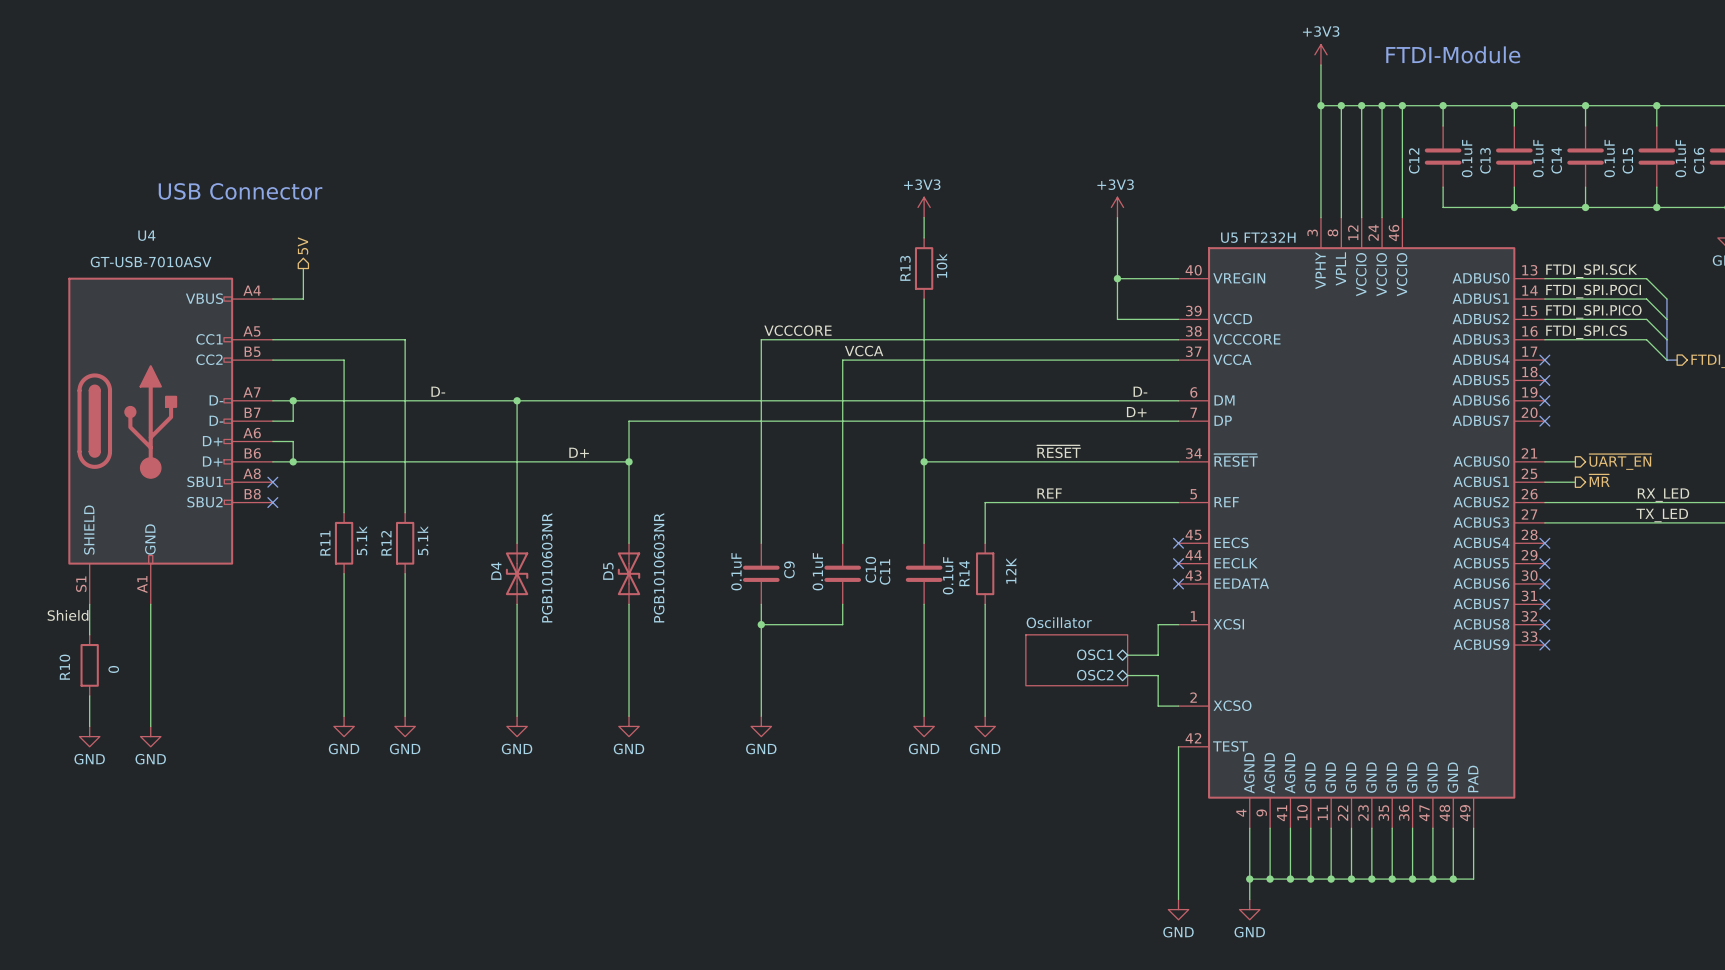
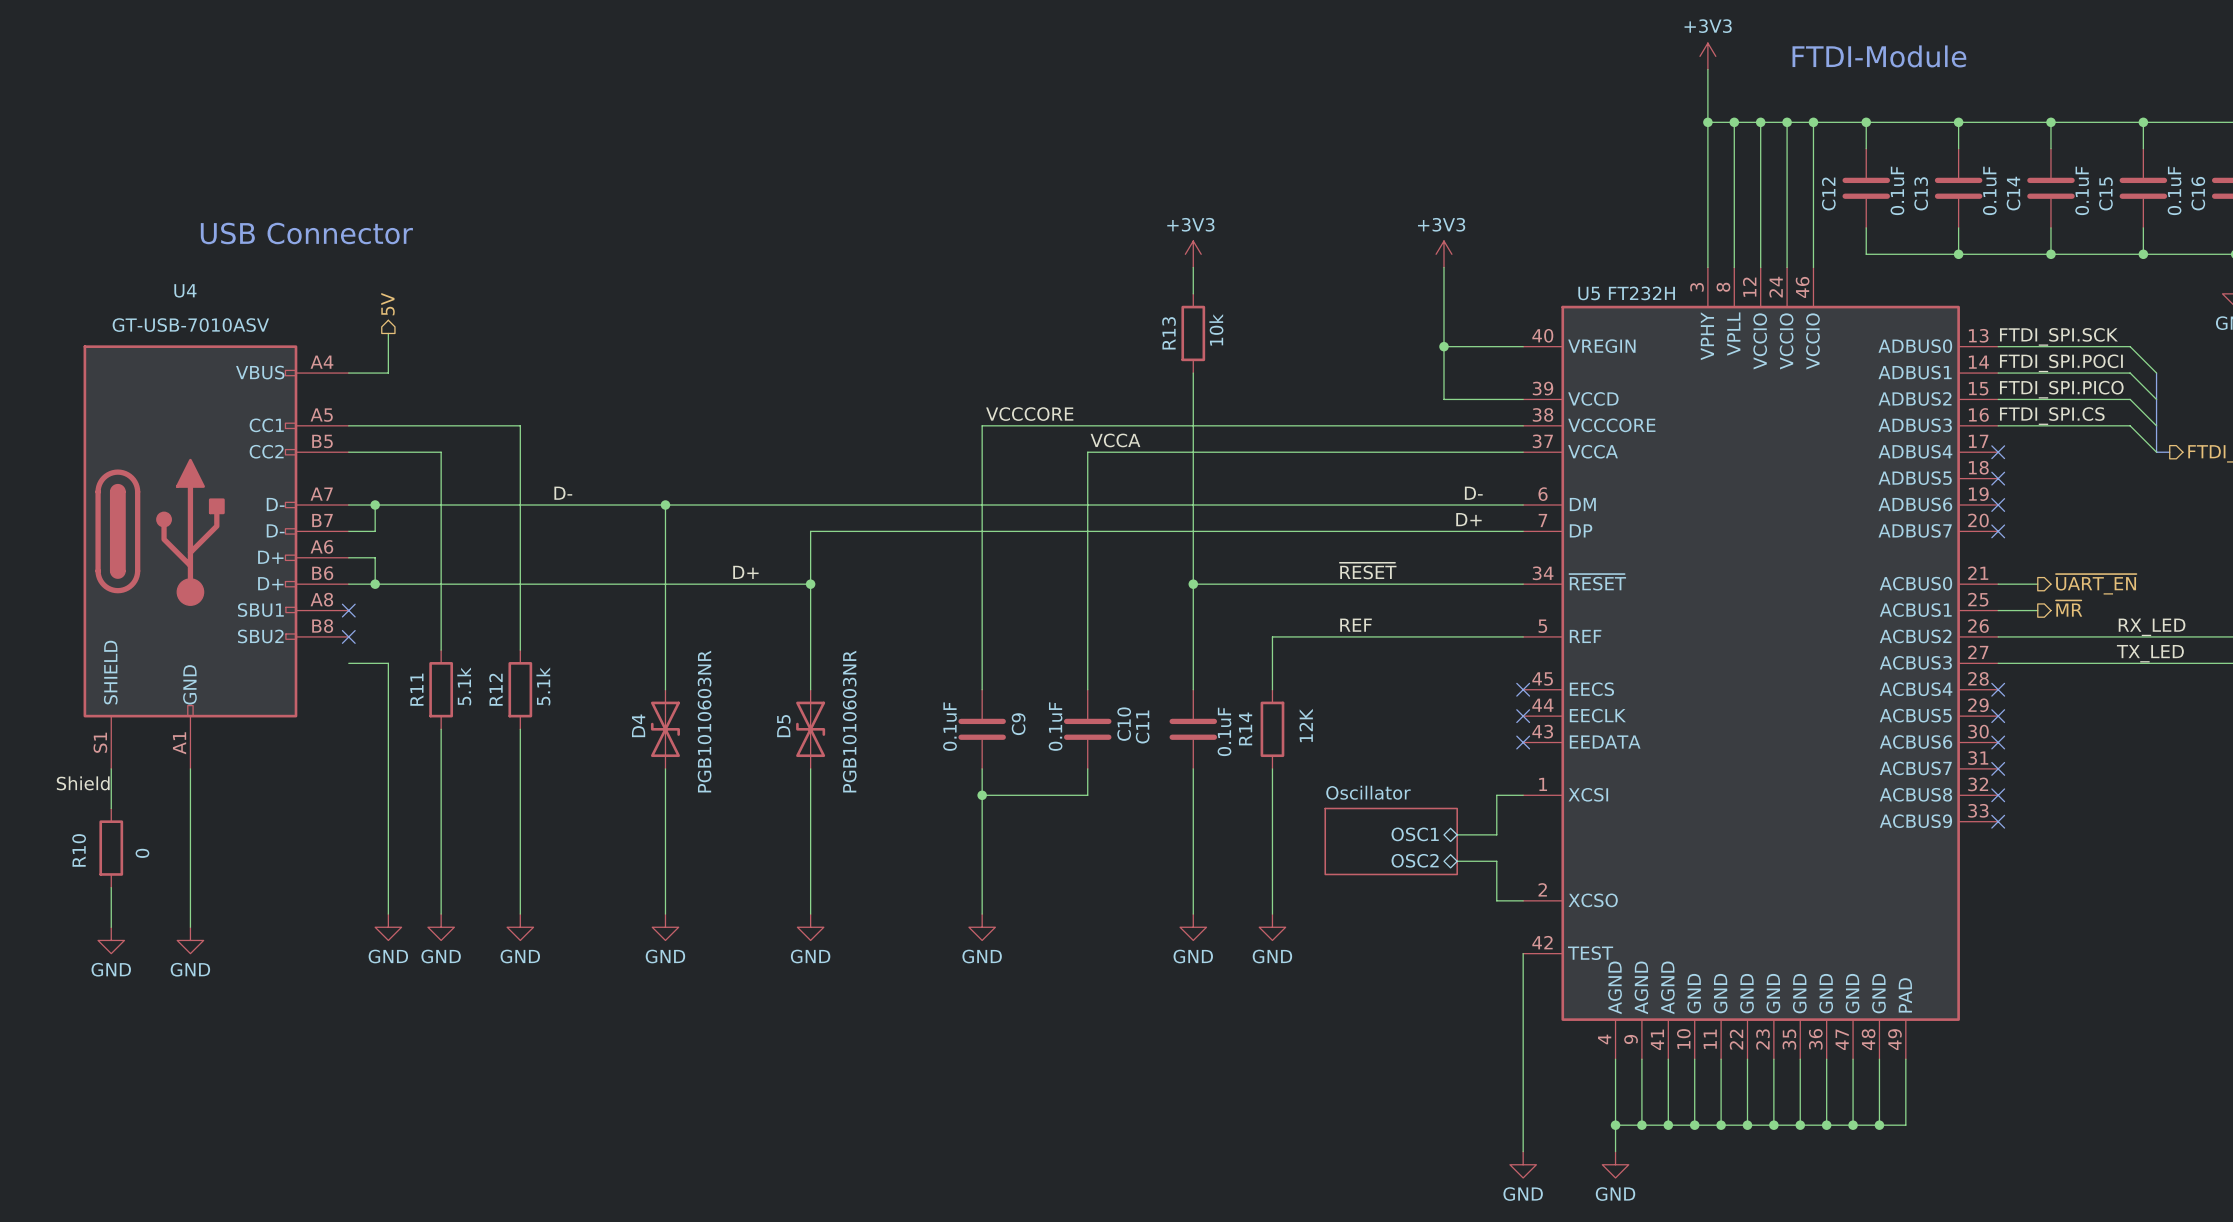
wire: none -> (348, 663) (388, 663) (388, 914)
power symbol: none -> GND (388, 927)

